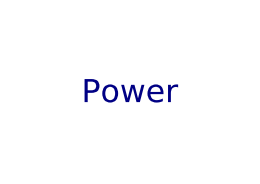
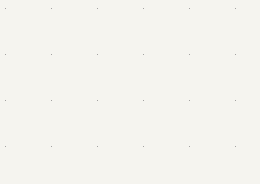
text: Power (131, 90) -> none

